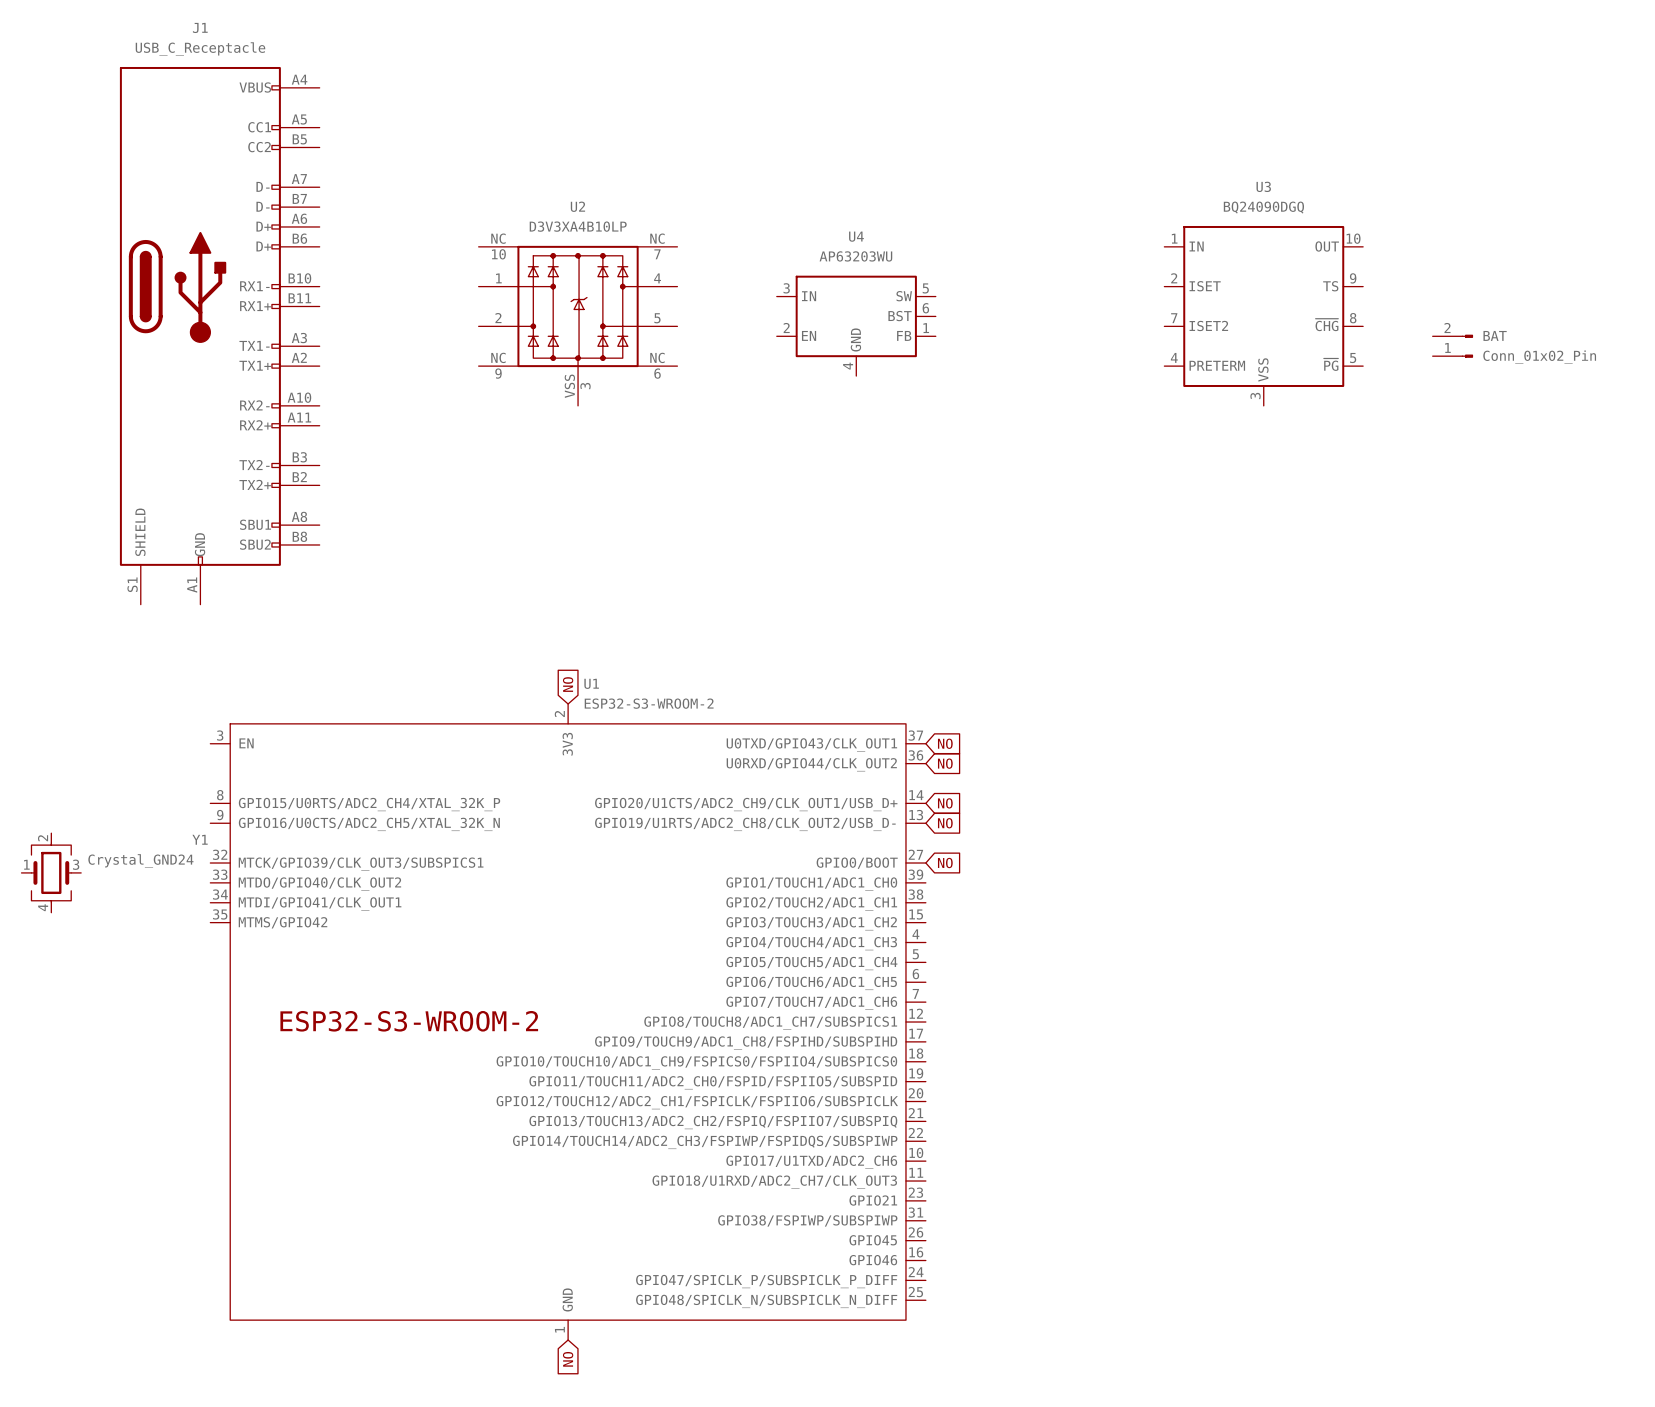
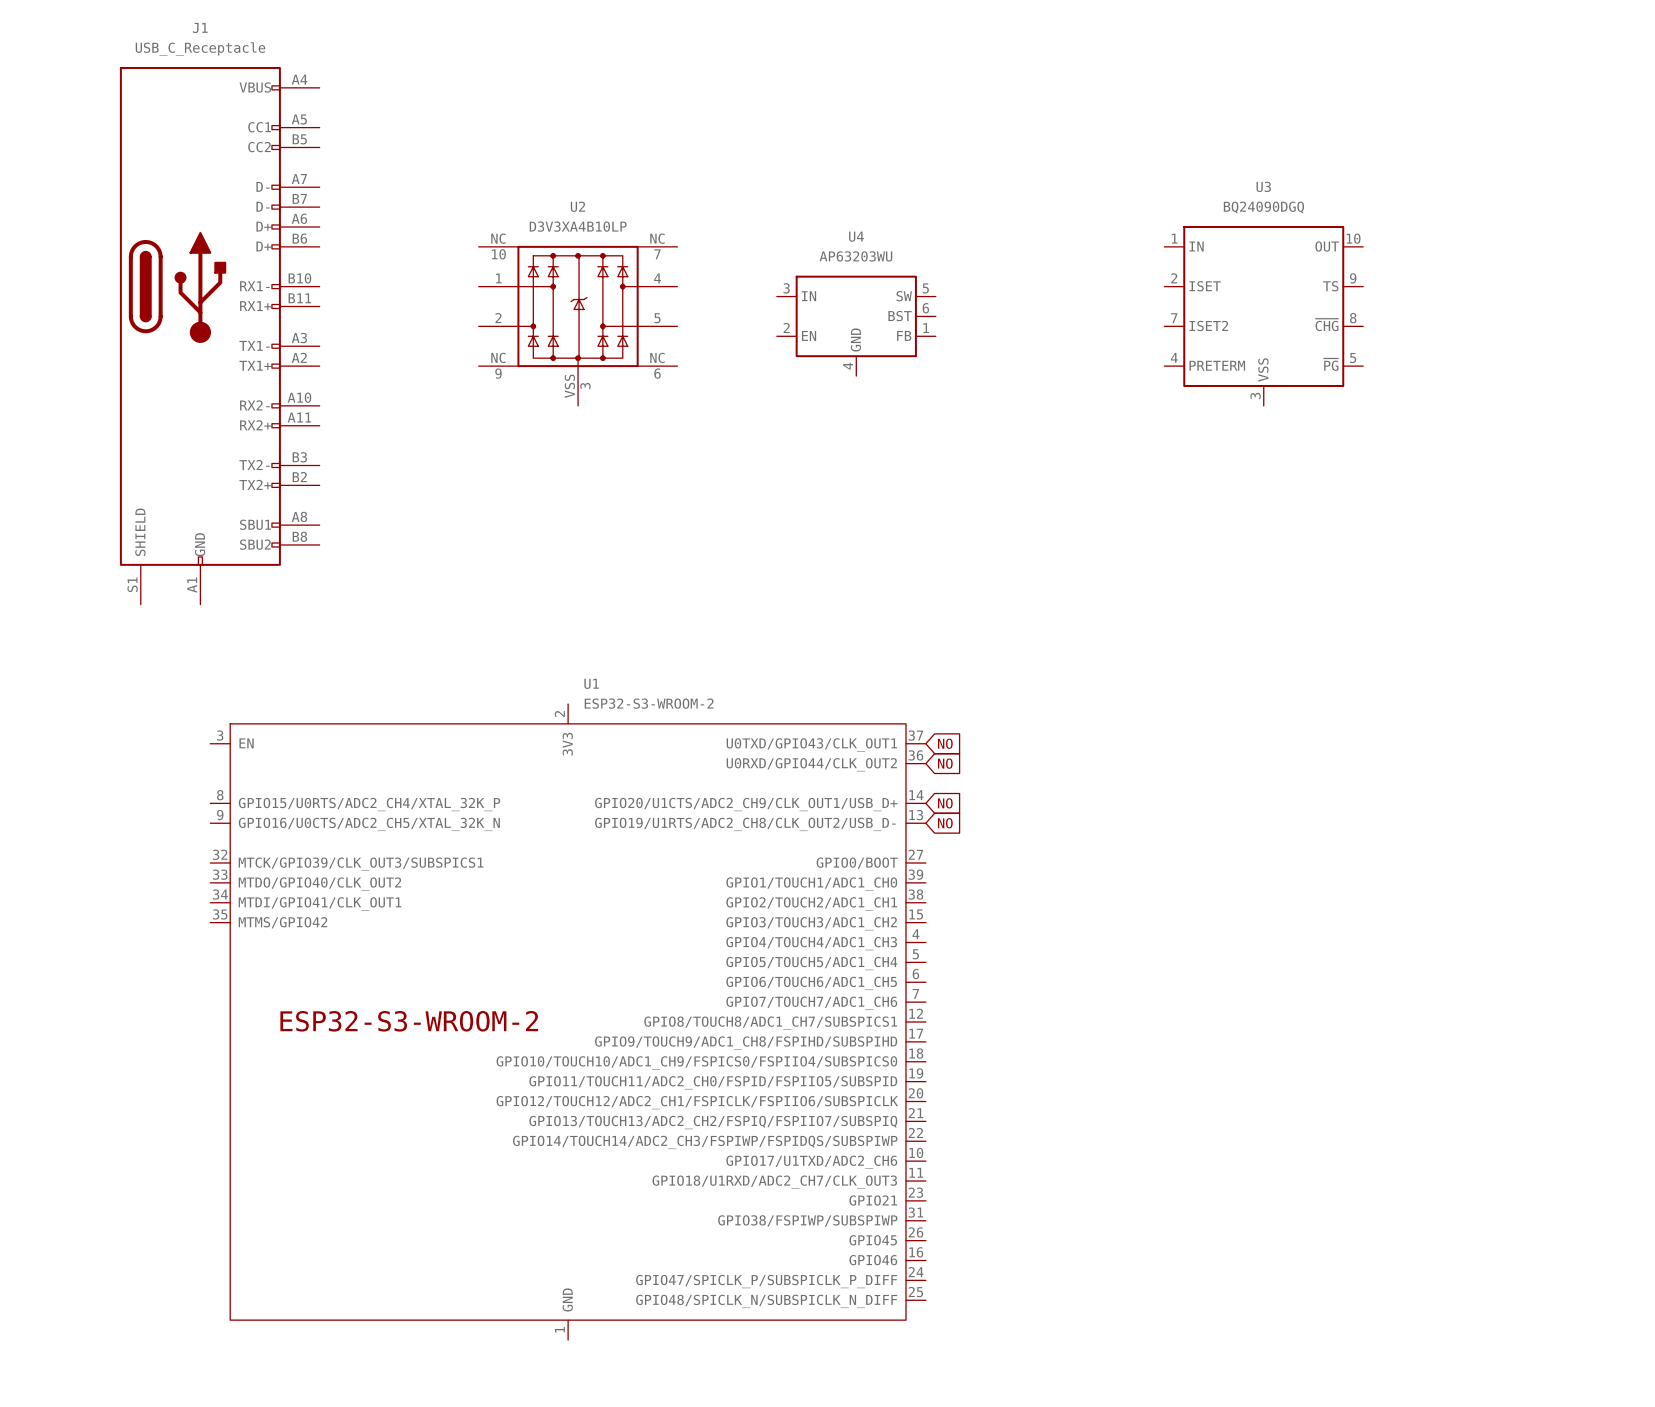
BAT: Conn_01x02_Pin (1452, 346) -> none
global label: NO (568, 684) -> none
global label: NO (945, 863) -> none
Y1: Crystal_GND24 (51, 872) -> none
global label: NO (568, 1359) -> none

